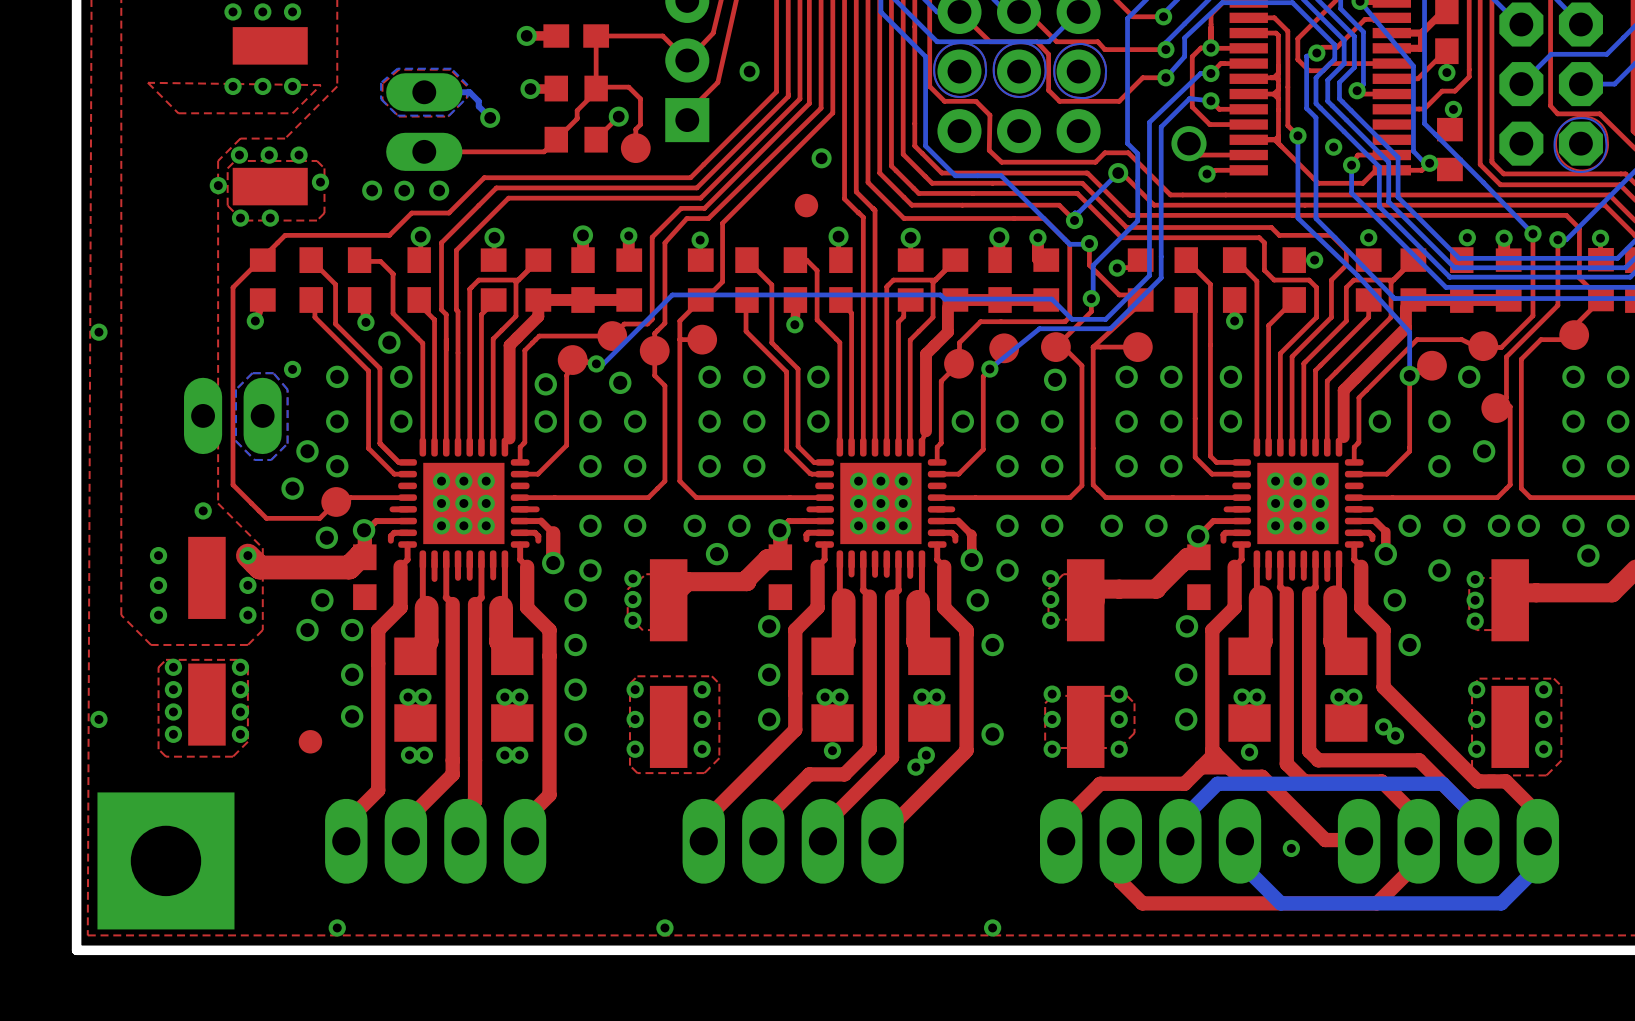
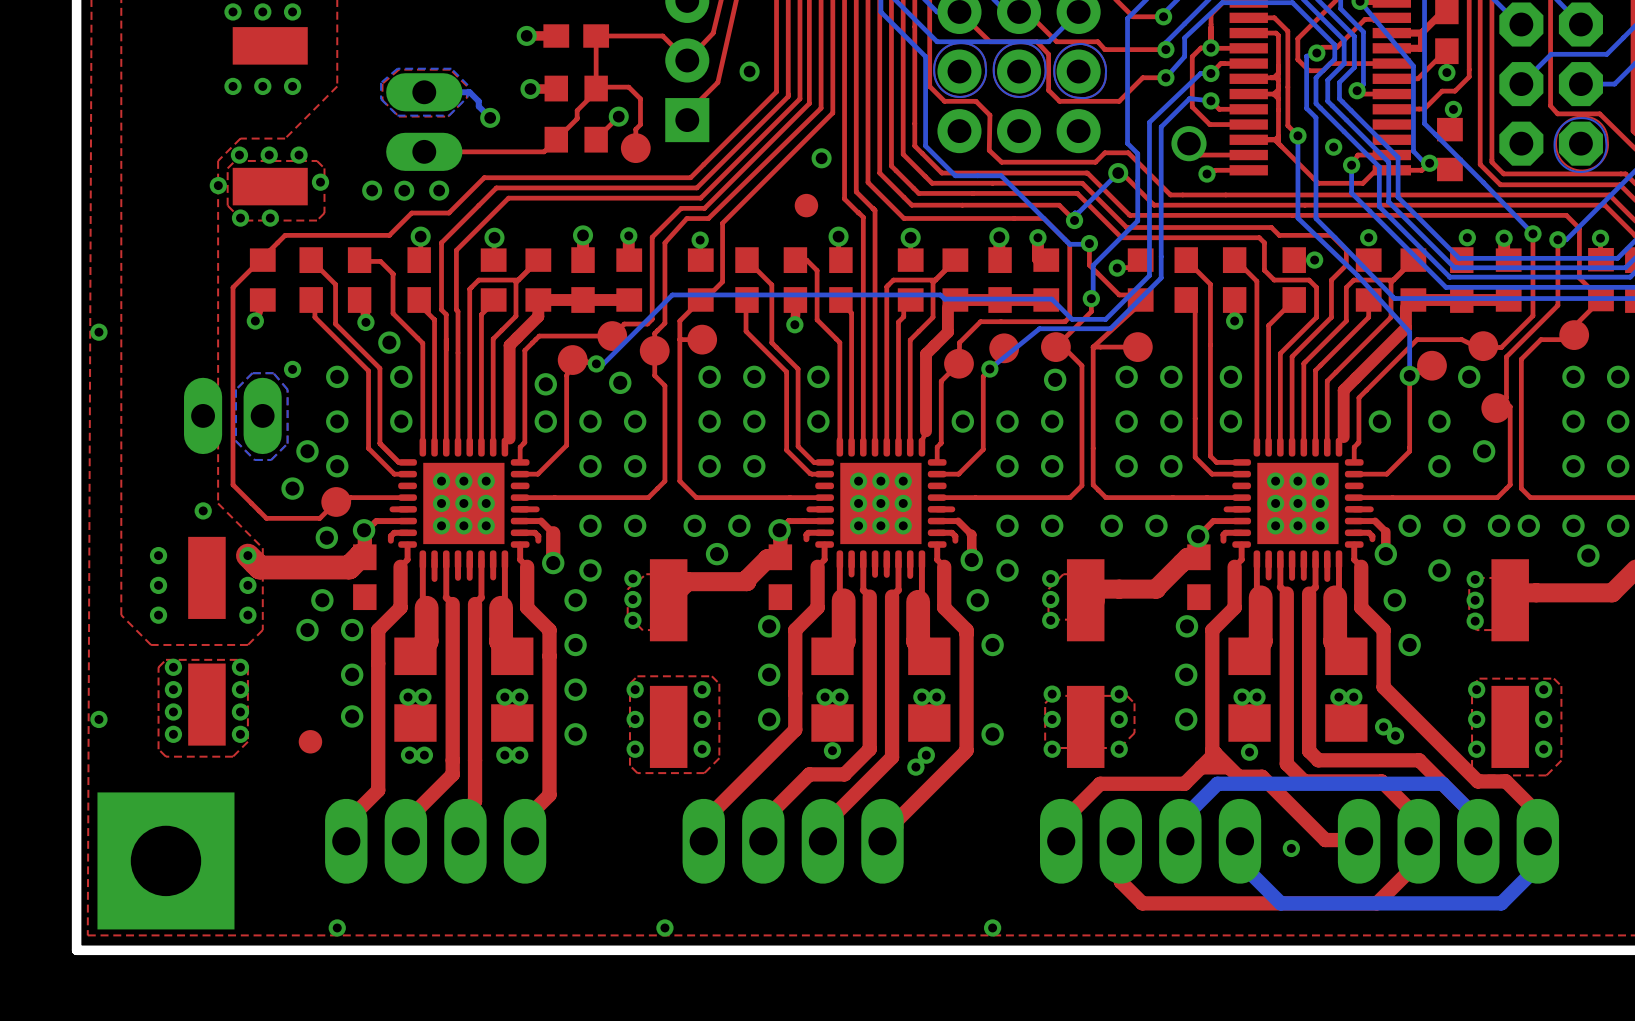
top zone outline: (147, 82) (178, 113) (292, 113) (320, 85) (147, 82) -> none

